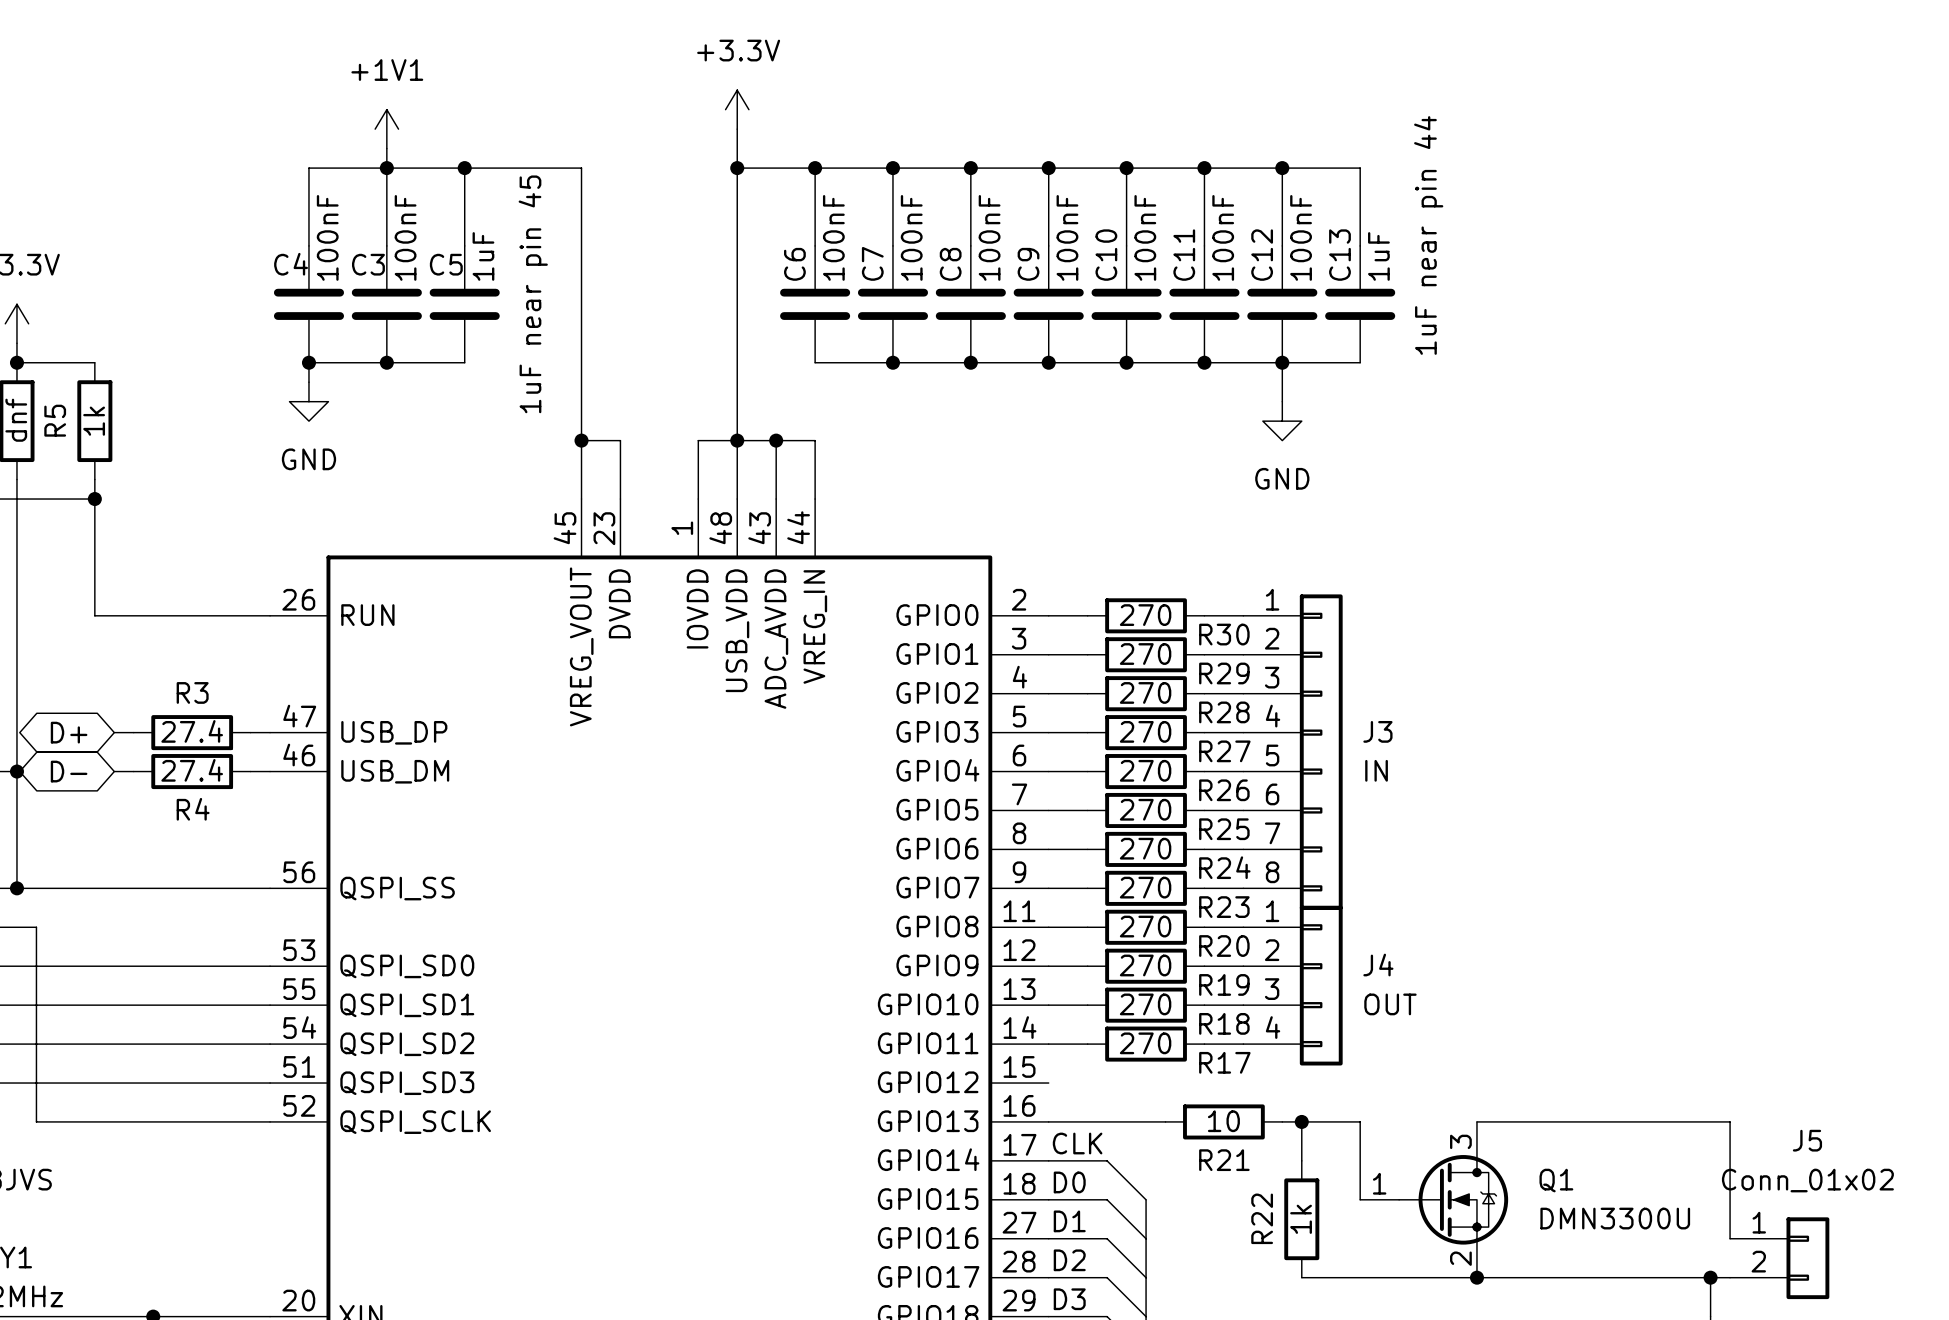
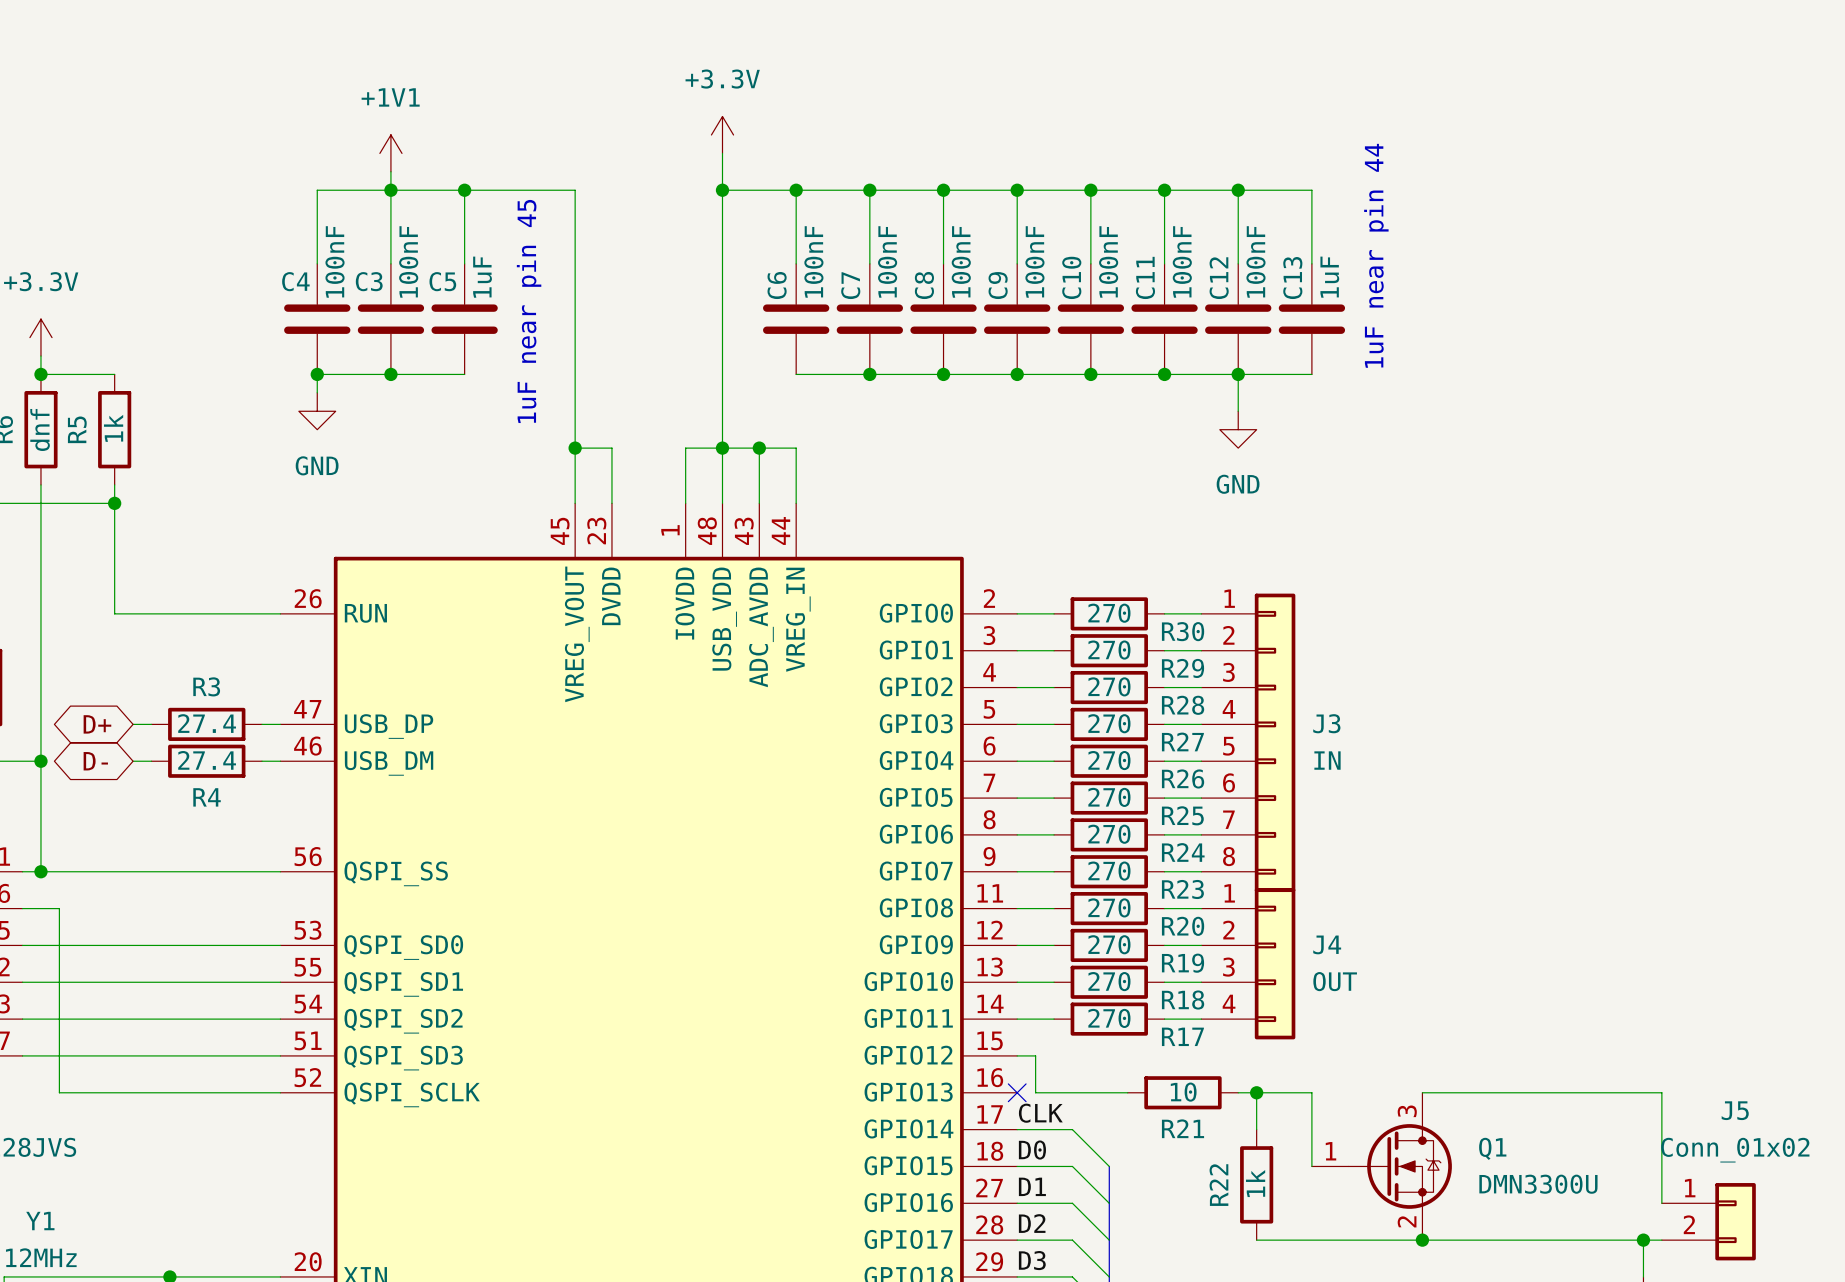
wire: (1048, 1121) (1068, 1121) -> (1017, 1055) (1035, 1055) (1035, 1092)
no-connect mark: none -> (1017, 1092)

